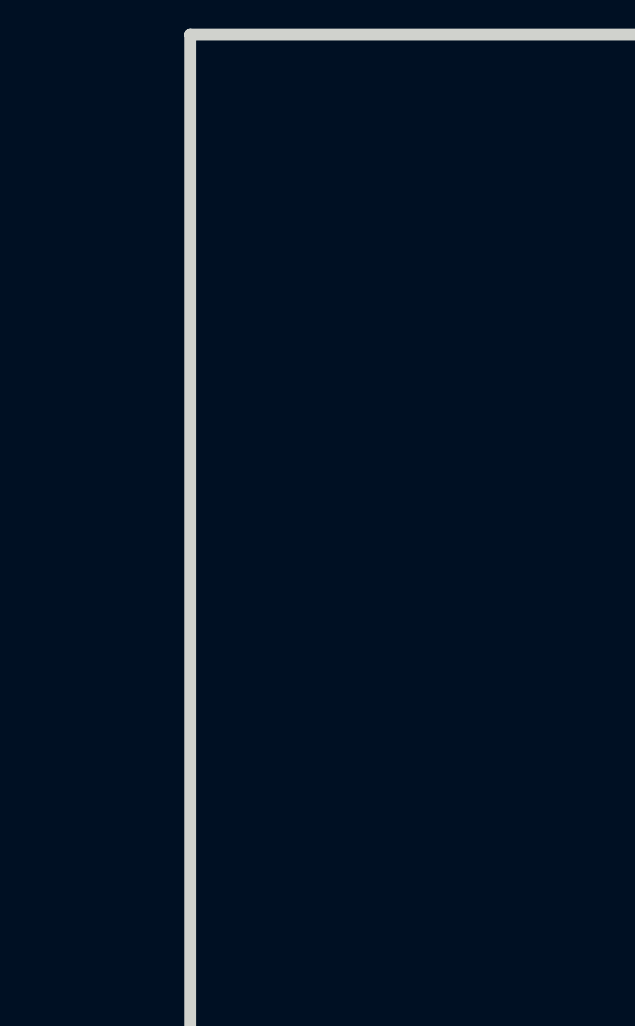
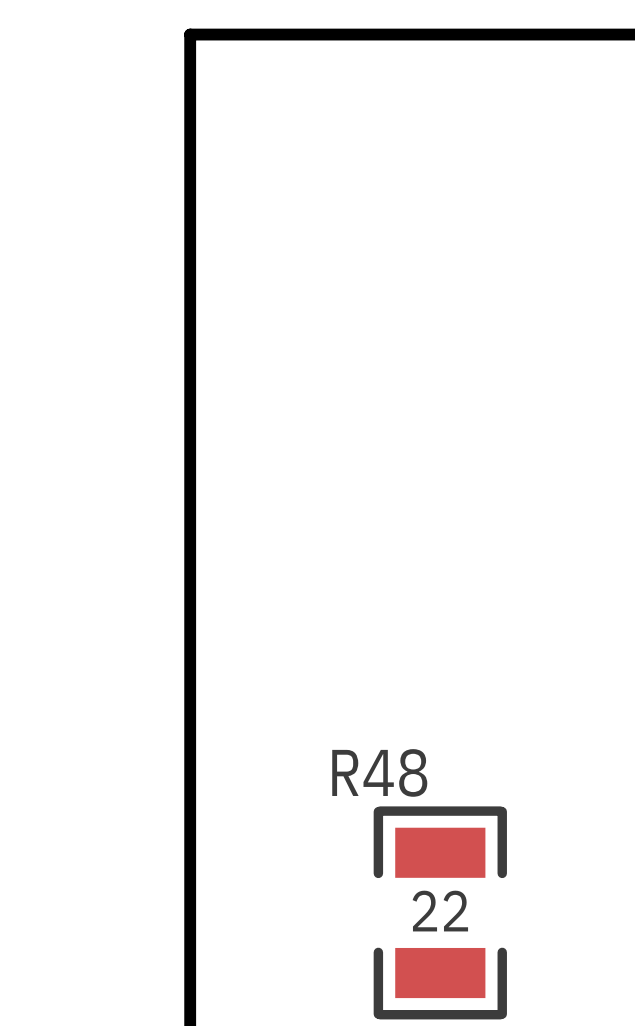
R48: none -> 22 (440, 912)

